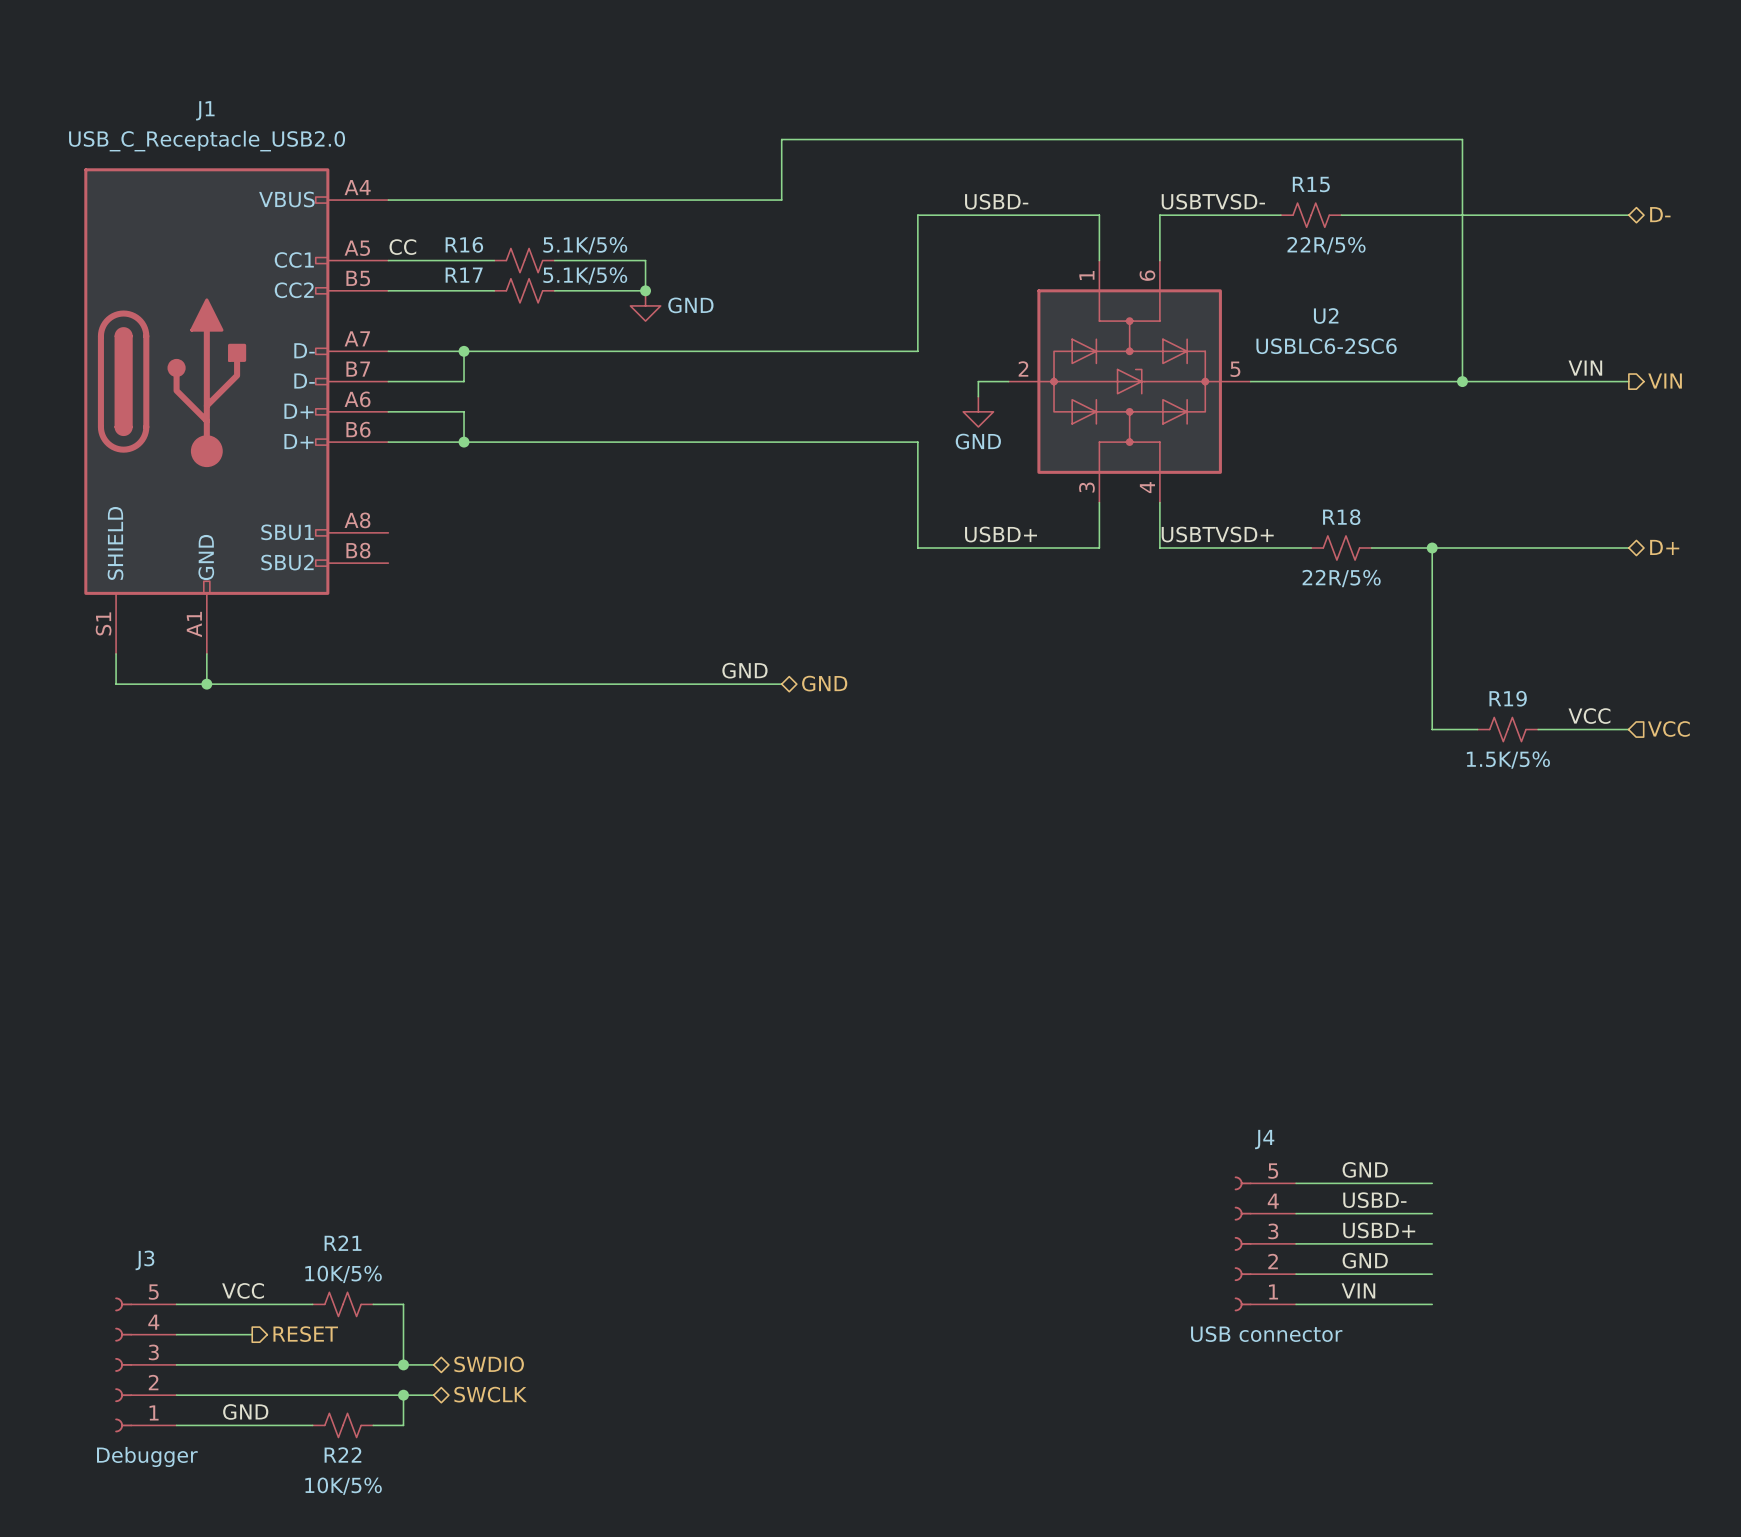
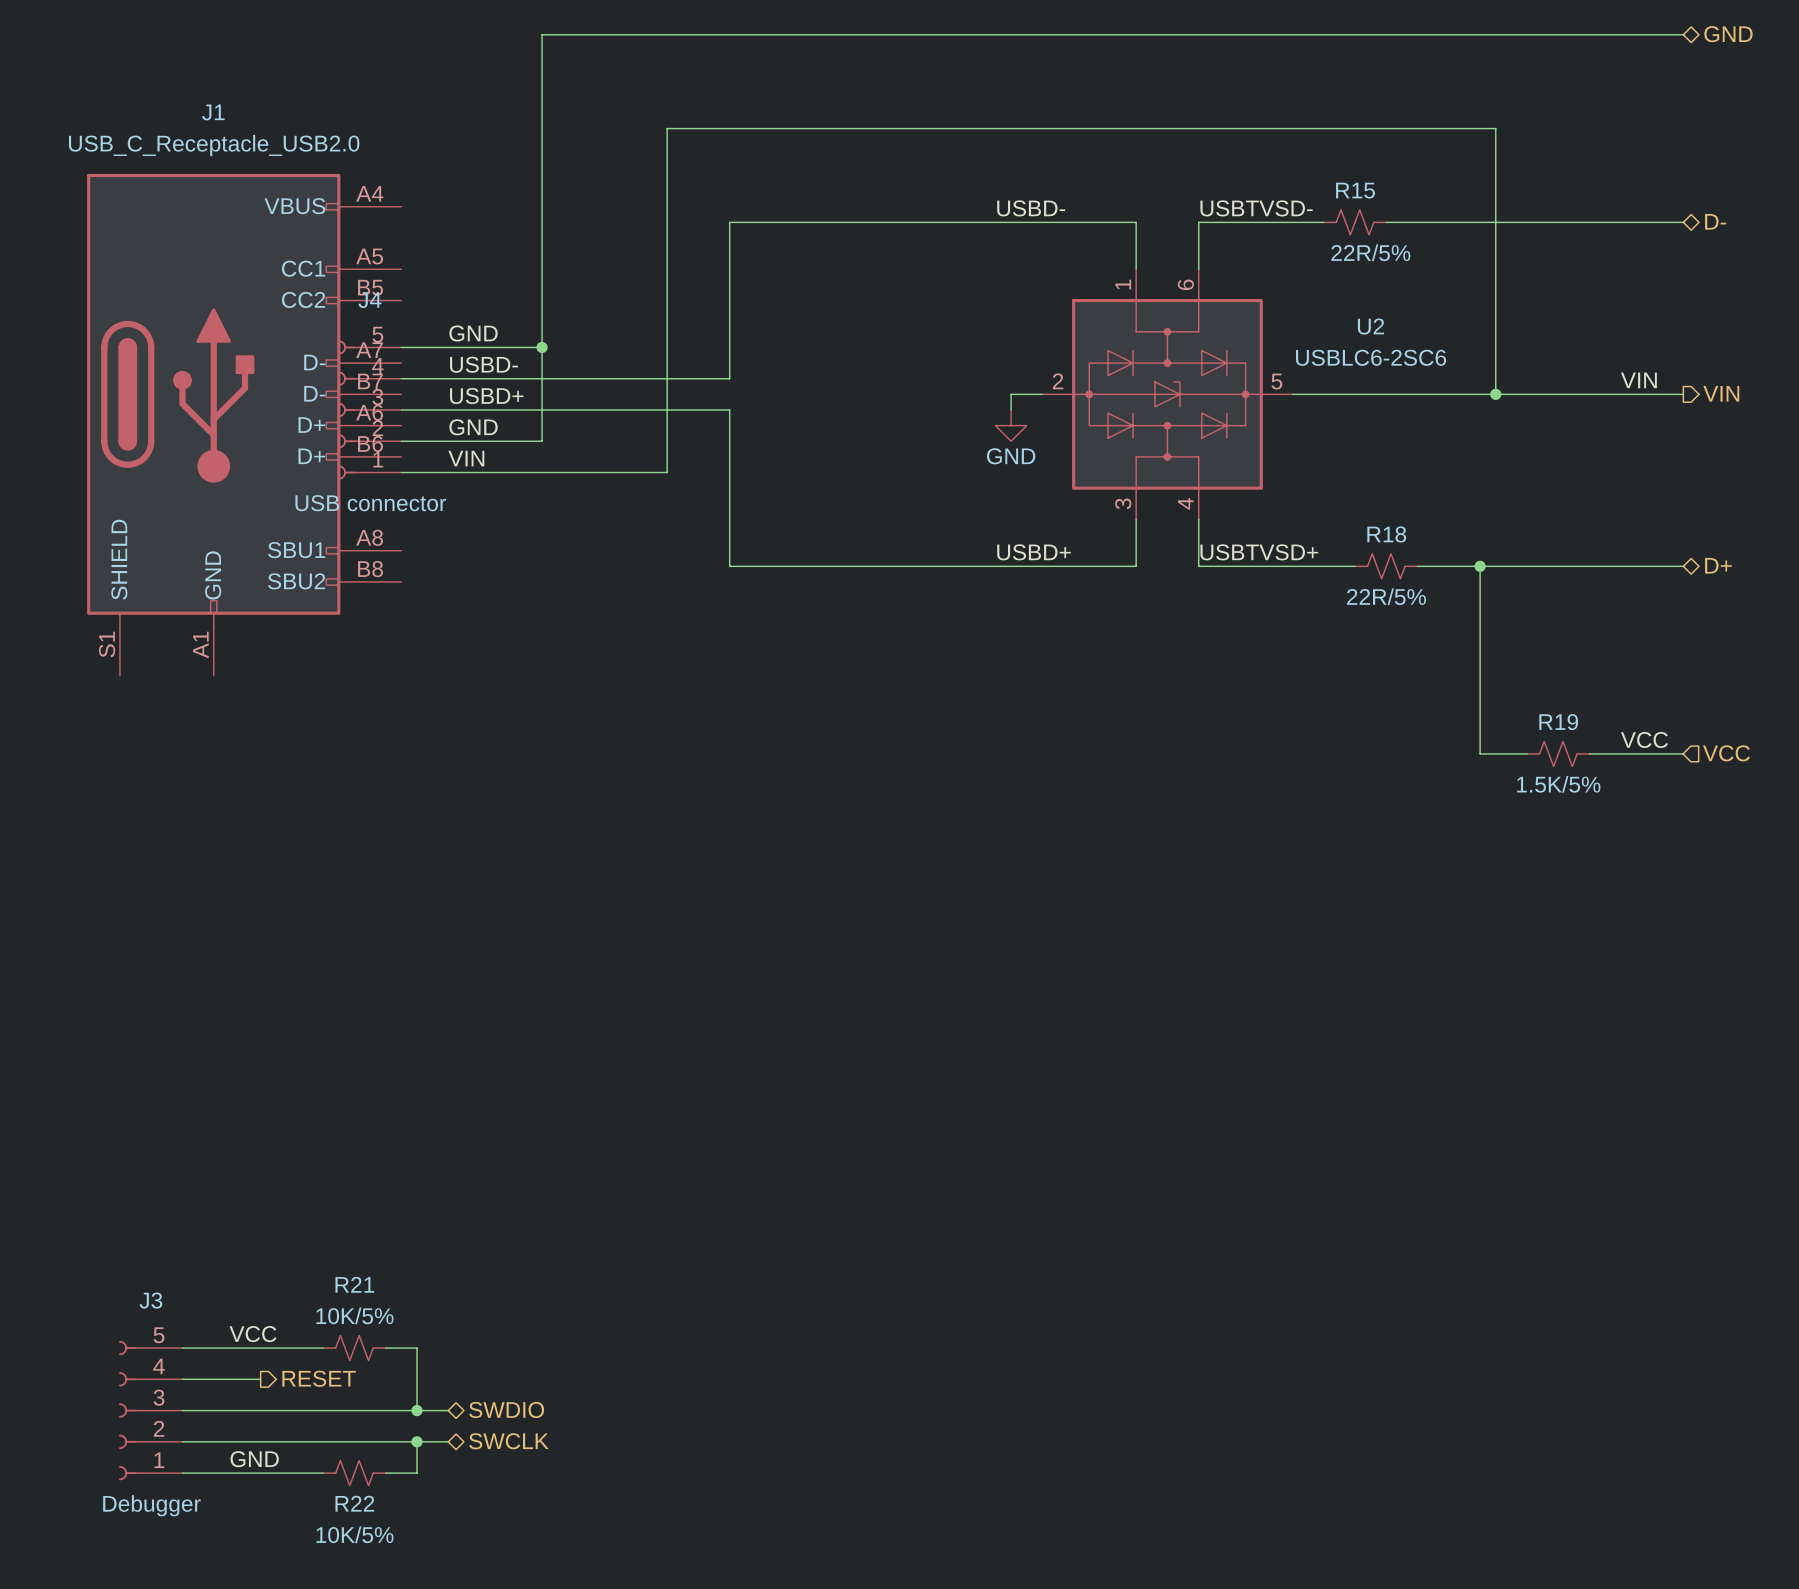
wire: none -> (1683, 34) (542, 34) (542, 441) (401, 441)
hierarchical label: none -> GND (1728, 34)
wire: (388, 200) (781, 200) (781, 139) (1462, 139) (1462, 381) -> none
wire: (917, 215) (917, 351) (388, 351) -> (948, 222) (729, 222) (729, 378) (401, 378)
label: CC (402, 247) -> none
wire: (388, 260) (494, 260) -> none
R16: 5.1K/5% (524, 260) -> none
wire: (554, 260) (645, 260) -> (1495, 394) (1495, 128) (667, 128) (667, 269)
wire: (388, 290) (494, 290) -> none
R17: 5.1K/5% (524, 290) -> none
wire: (554, 290) (645, 290) -> (401, 472) (667, 472) (667, 300)
junction: (645, 290) -> none
power symbol: GND (645, 305) -> none
label: none -> GND (473, 333)
wire: none -> (401, 347) (542, 347)
junction: none -> (542, 347)
wire: (464, 351) (464, 381) (388, 381) -> none
junction: (464, 351) -> none
label: none -> USBD- (483, 364)
junction position: (1462, 381) -> (1495, 394)
label: none -> USBD+ (486, 396)
wire: (388, 411) (464, 411) (464, 442) -> none
label: none -> GND (473, 427)
wire: (388, 442) (917, 442) (917, 548) -> (401, 409) (729, 409) (729, 566) (948, 566)
junction: (464, 442) -> none
label: none -> VIN (466, 458)
wire: (116, 653) (116, 684) (781, 684) -> none
wire: (206, 653) (206, 684) -> none
label: GND (744, 670) -> none
hierarchical label: GND (824, 683) -> none
junction: (206, 684) -> none
label: GND (1365, 1169) -> none
wire: (1296, 1183) (1432, 1183) -> none
label: USBD- (1374, 1200) -> none
wire: (1296, 1213) (1432, 1213) -> none
label: USBD+ (1379, 1230) -> none
J4 position: (1265, 1243) -> (369, 409)
wire: (1296, 1243) (1432, 1243) -> none
label: GND (1365, 1260) -> none
wire: (1296, 1274) (1432, 1274) -> none
label: VIN (1358, 1290) -> none
wire: (1296, 1304) (1432, 1304) -> none

